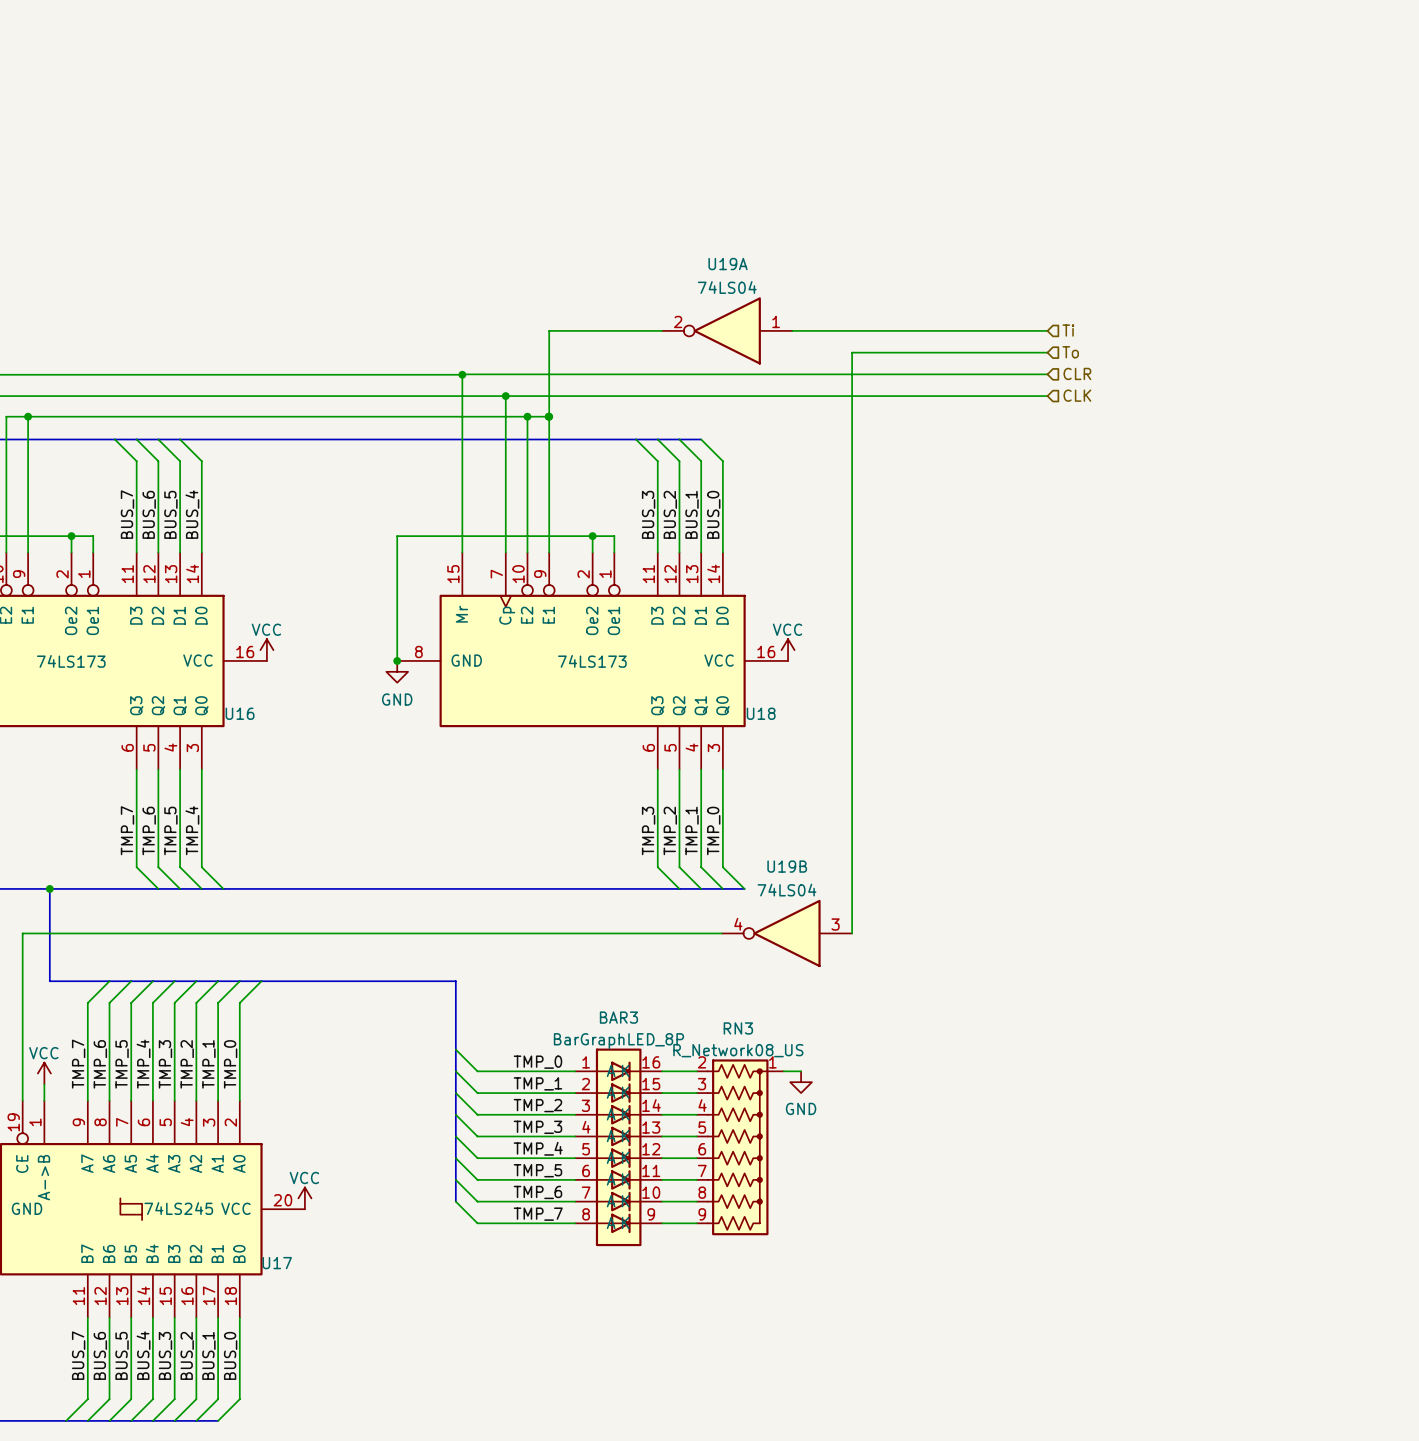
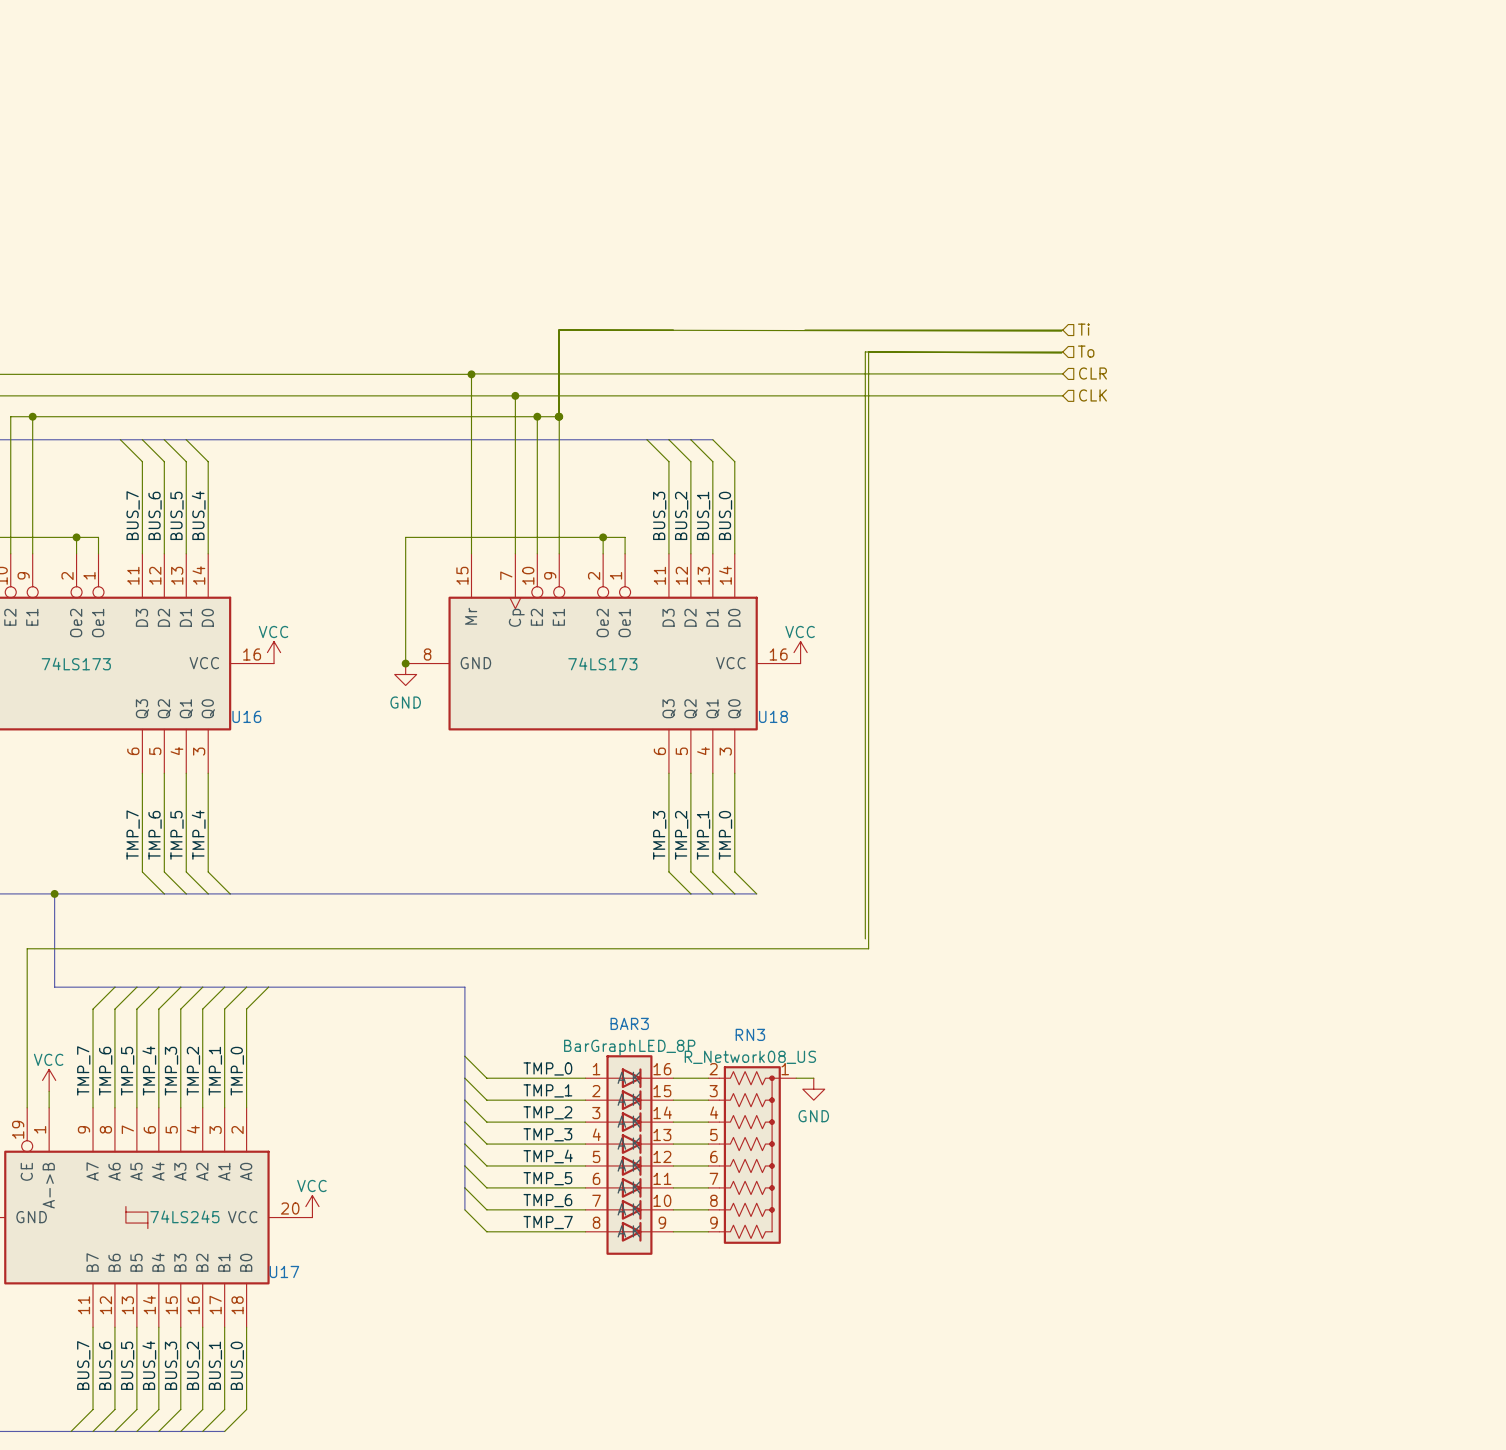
U19A: 74LS04 (727, 330) -> none
wire: none -> (1061, 331) (558, 330) (558, 416)
wire: (721, 933) (22, 933) (22, 943) -> (1061, 353) (868, 351) (868, 948) (27, 948)
U19B: 74LS04 (786, 933) -> none

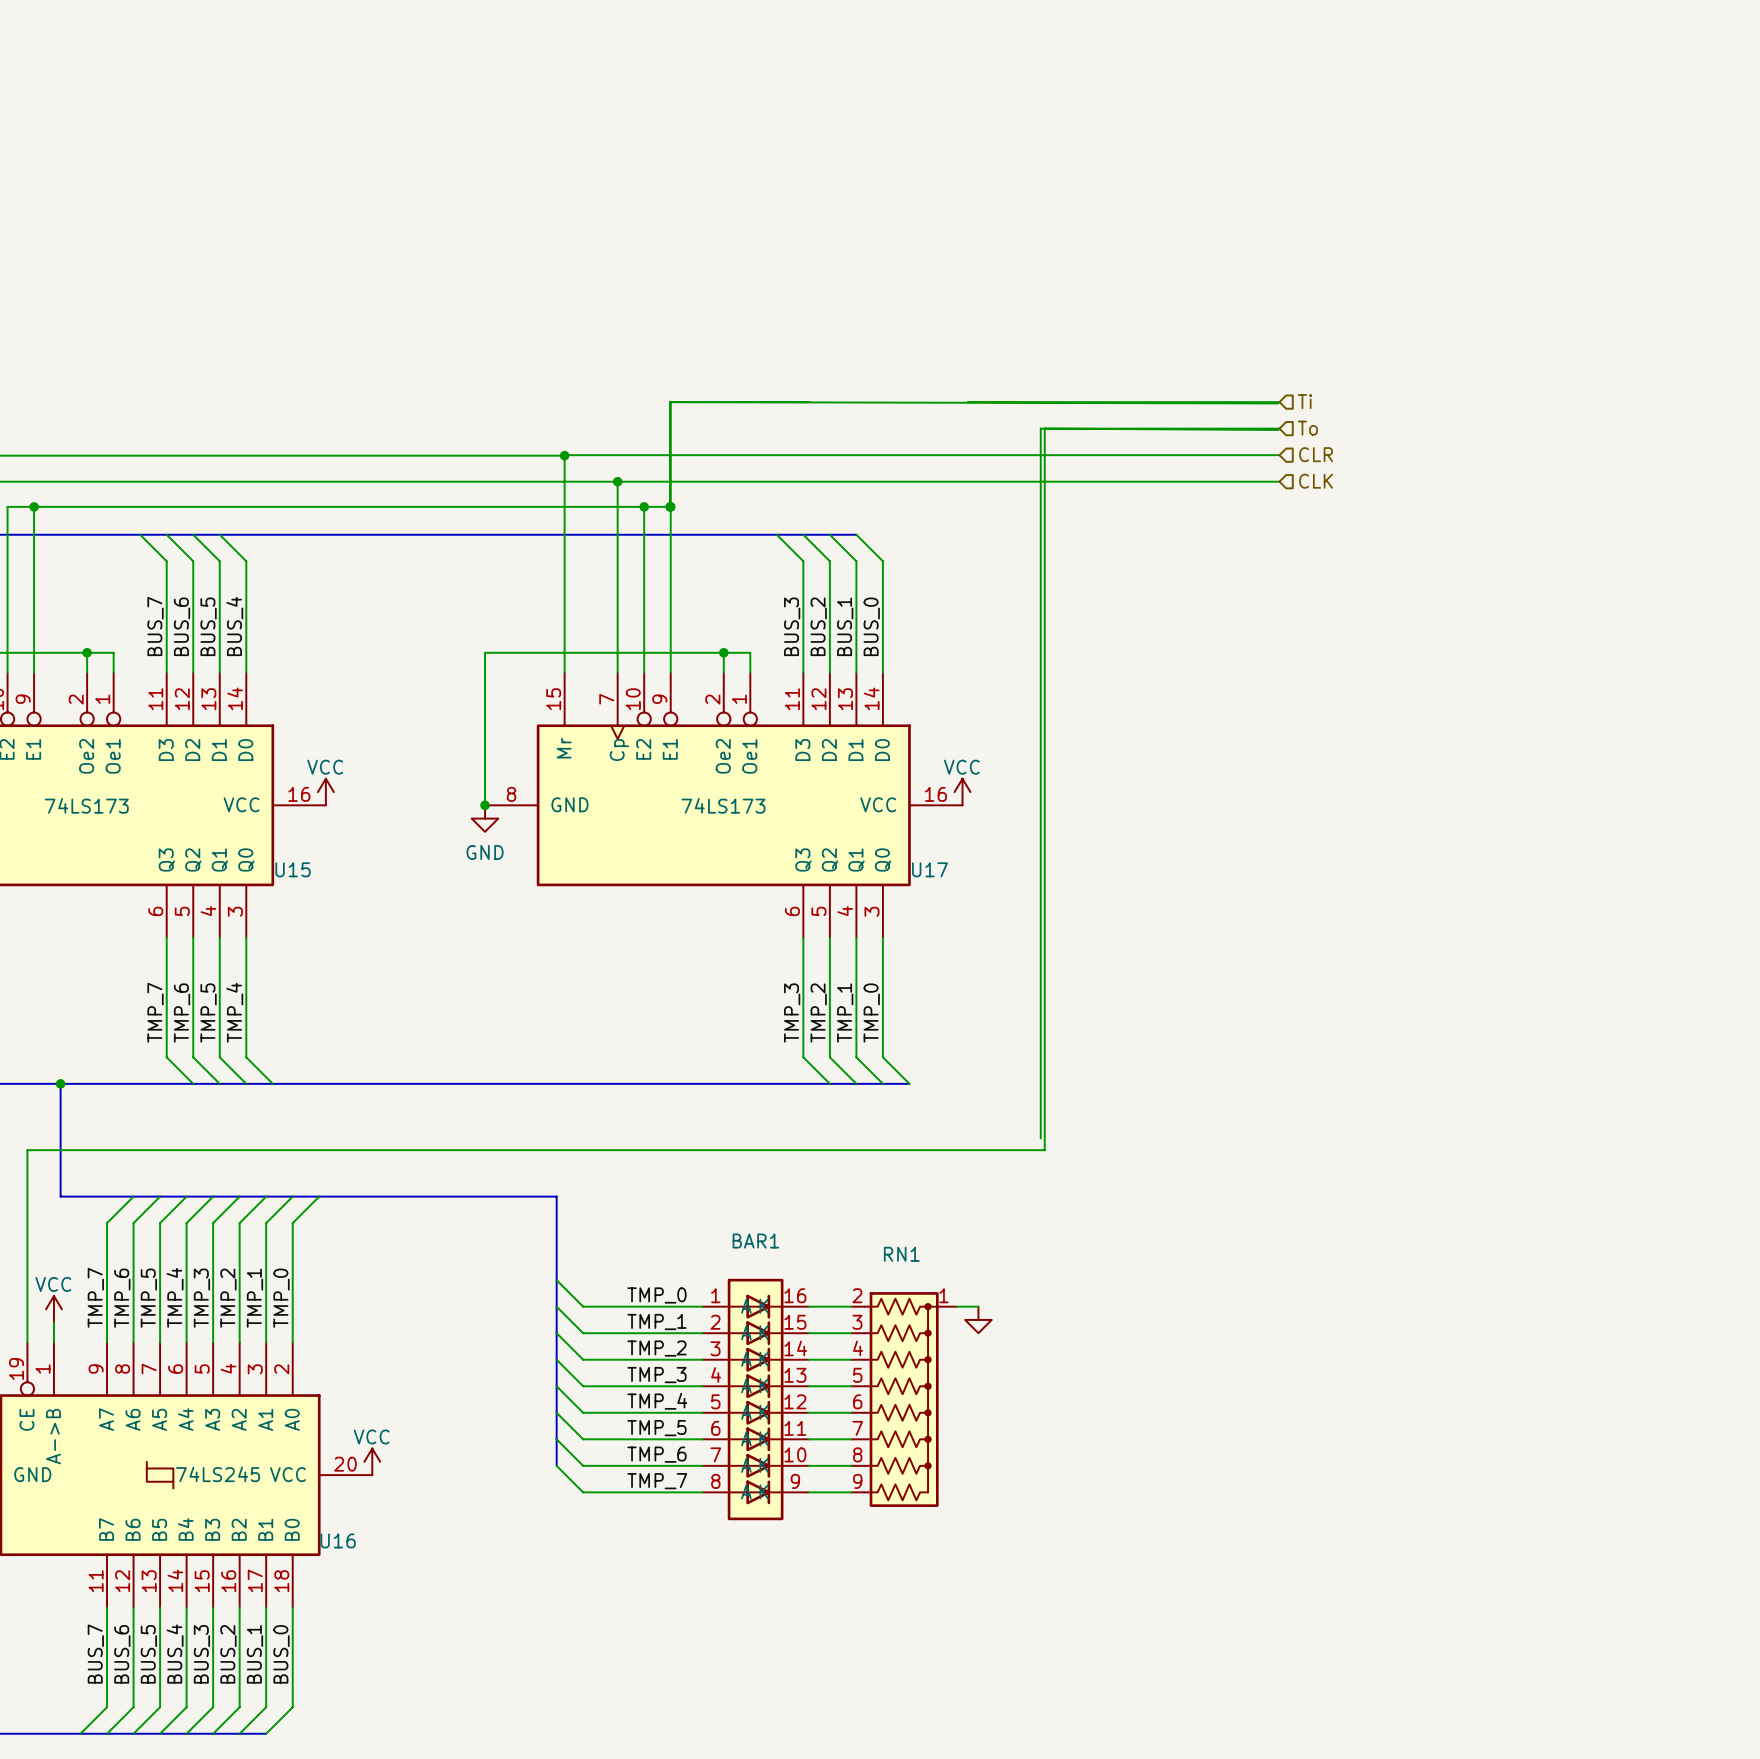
U16 name: U16 (246, 716) -> U15 (293, 869)
U18 name: U18 (773, 716) -> U17 (929, 869)
BAR3 name: BAR3 (629, 1023) -> BAR1 (755, 1241)
RN3 name: RN3 (750, 1034) -> RN1 (901, 1254)
BAR3 value: BarGraphLED_8P (629, 1047) -> none
RN3 value: R_Network08_US (750, 1057) -> none
power symbol text: GND (813, 1116) -> none
U17 name: U17 (284, 1271) -> U16 (338, 1540)

